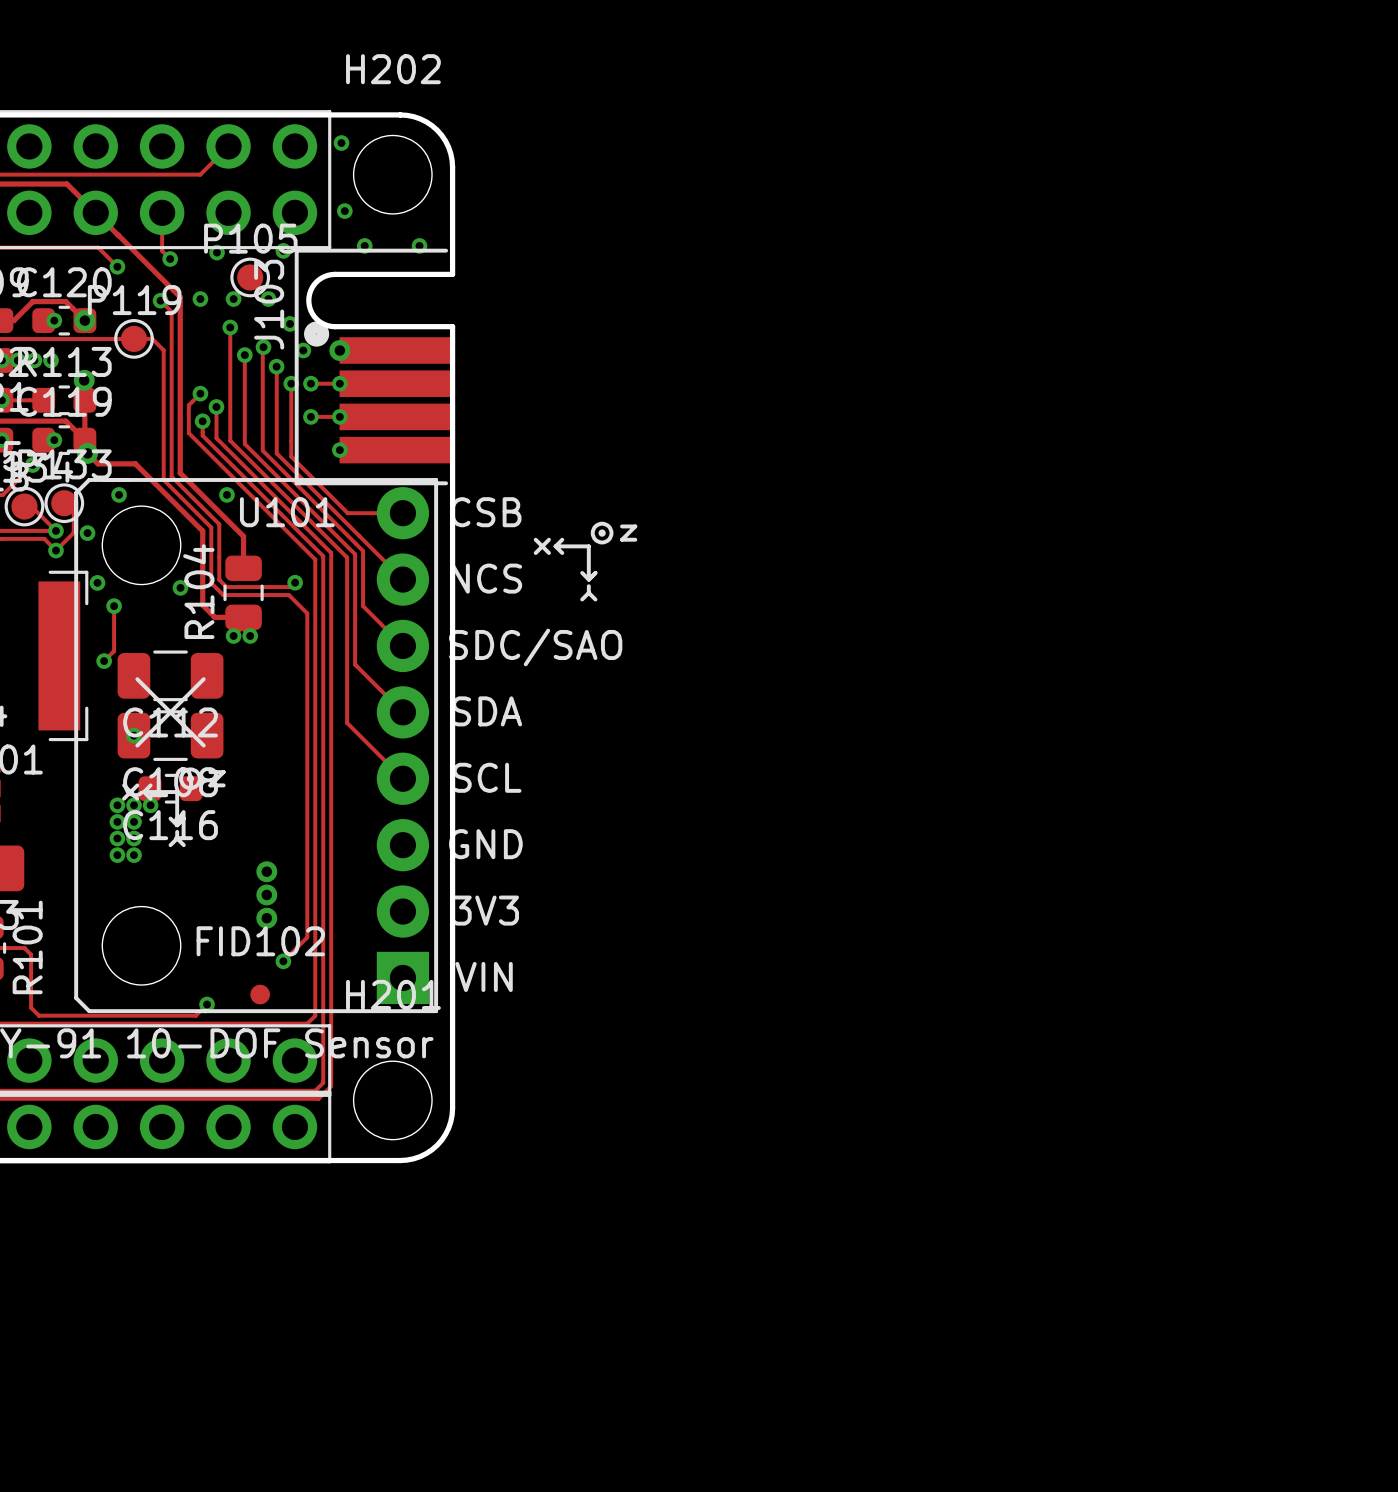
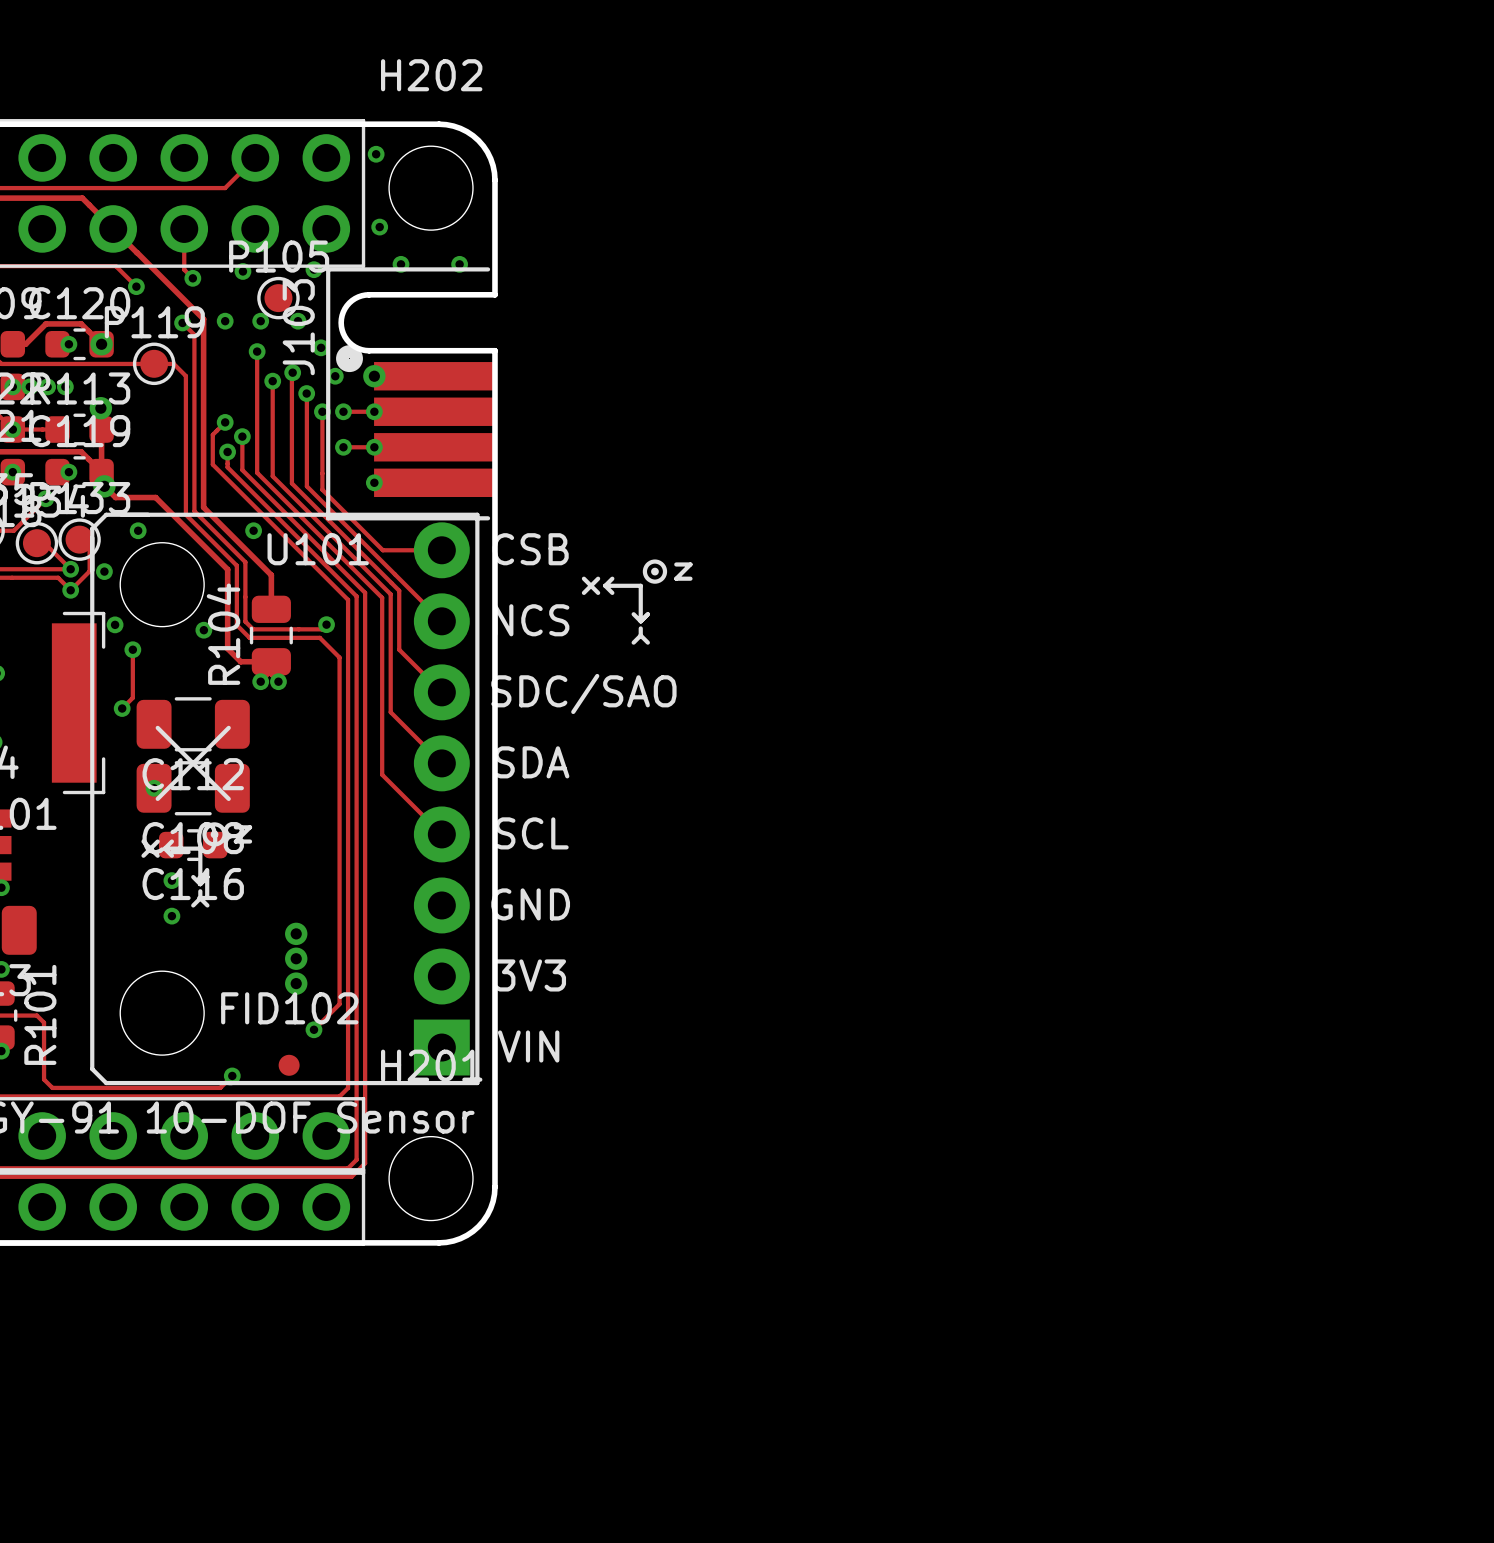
via: (117, 805) -> none
via: (134, 805) -> none
via: (150, 805) -> none
via: (117, 821) -> none
via: (134, 821) -> none
via: none -> (171, 880)
via: (117, 838) -> none
via: (134, 838) -> none
via: (117, 855) -> none
via: (134, 855) -> none
via: none -> (171, 916)

